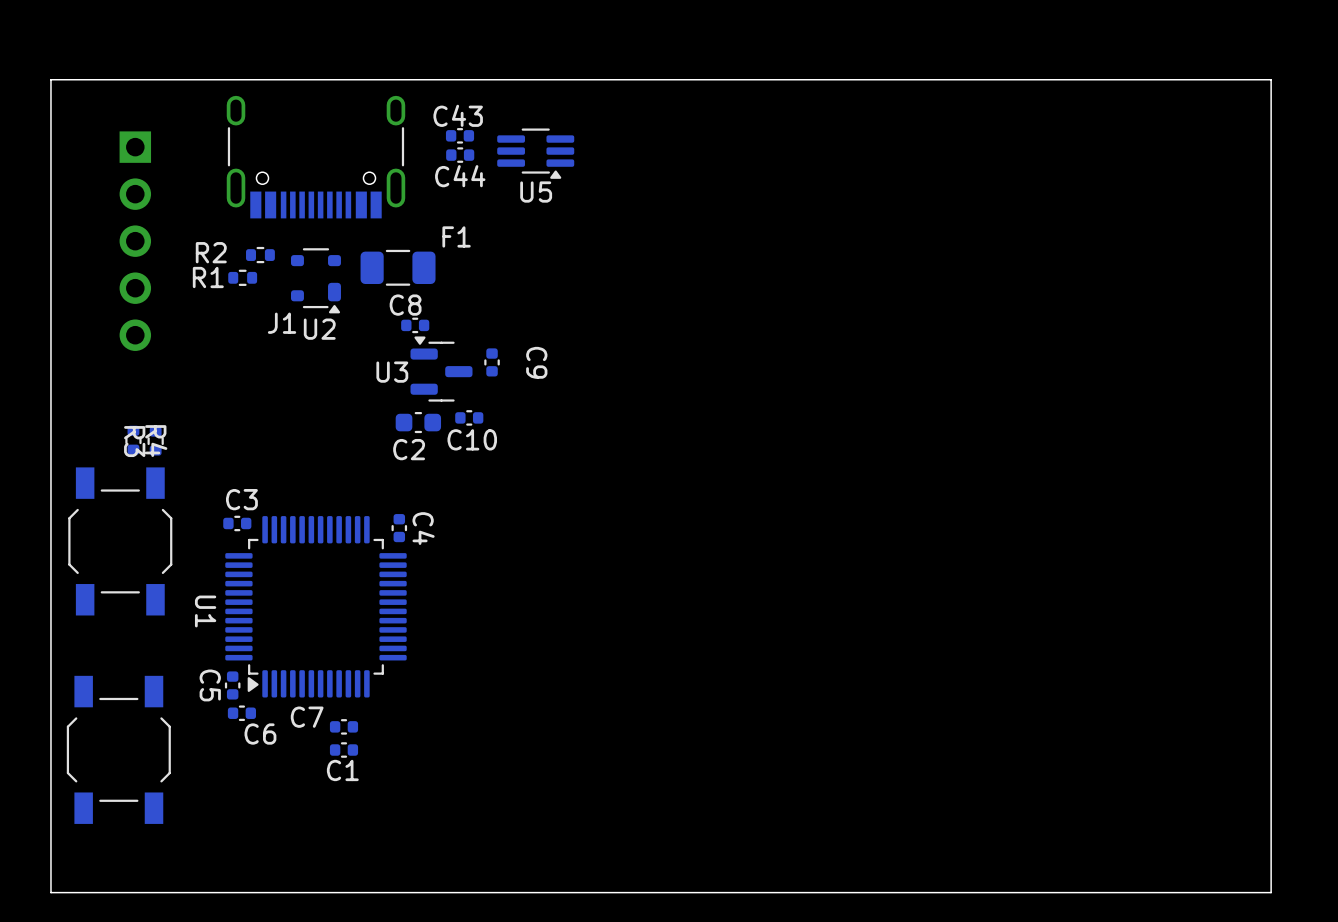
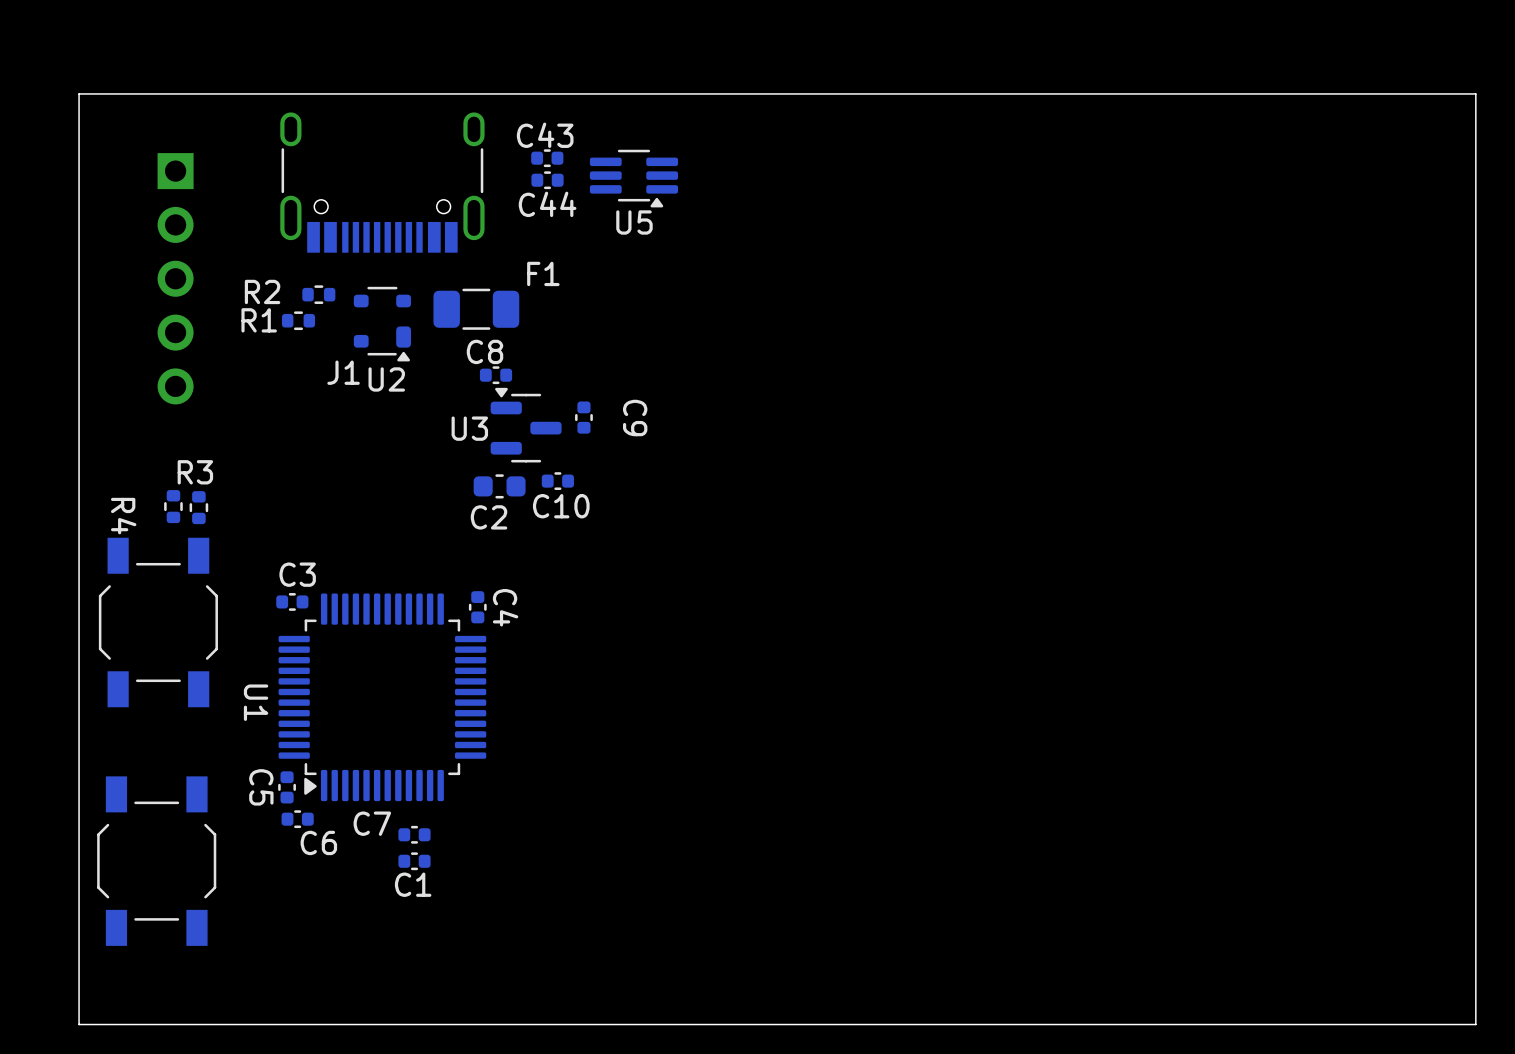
R3 name rotation: 0° (134, 441) -> 90° counterclockwise (195, 472)
R4 name position: R4 (156, 441) -> R4 (123, 516)

